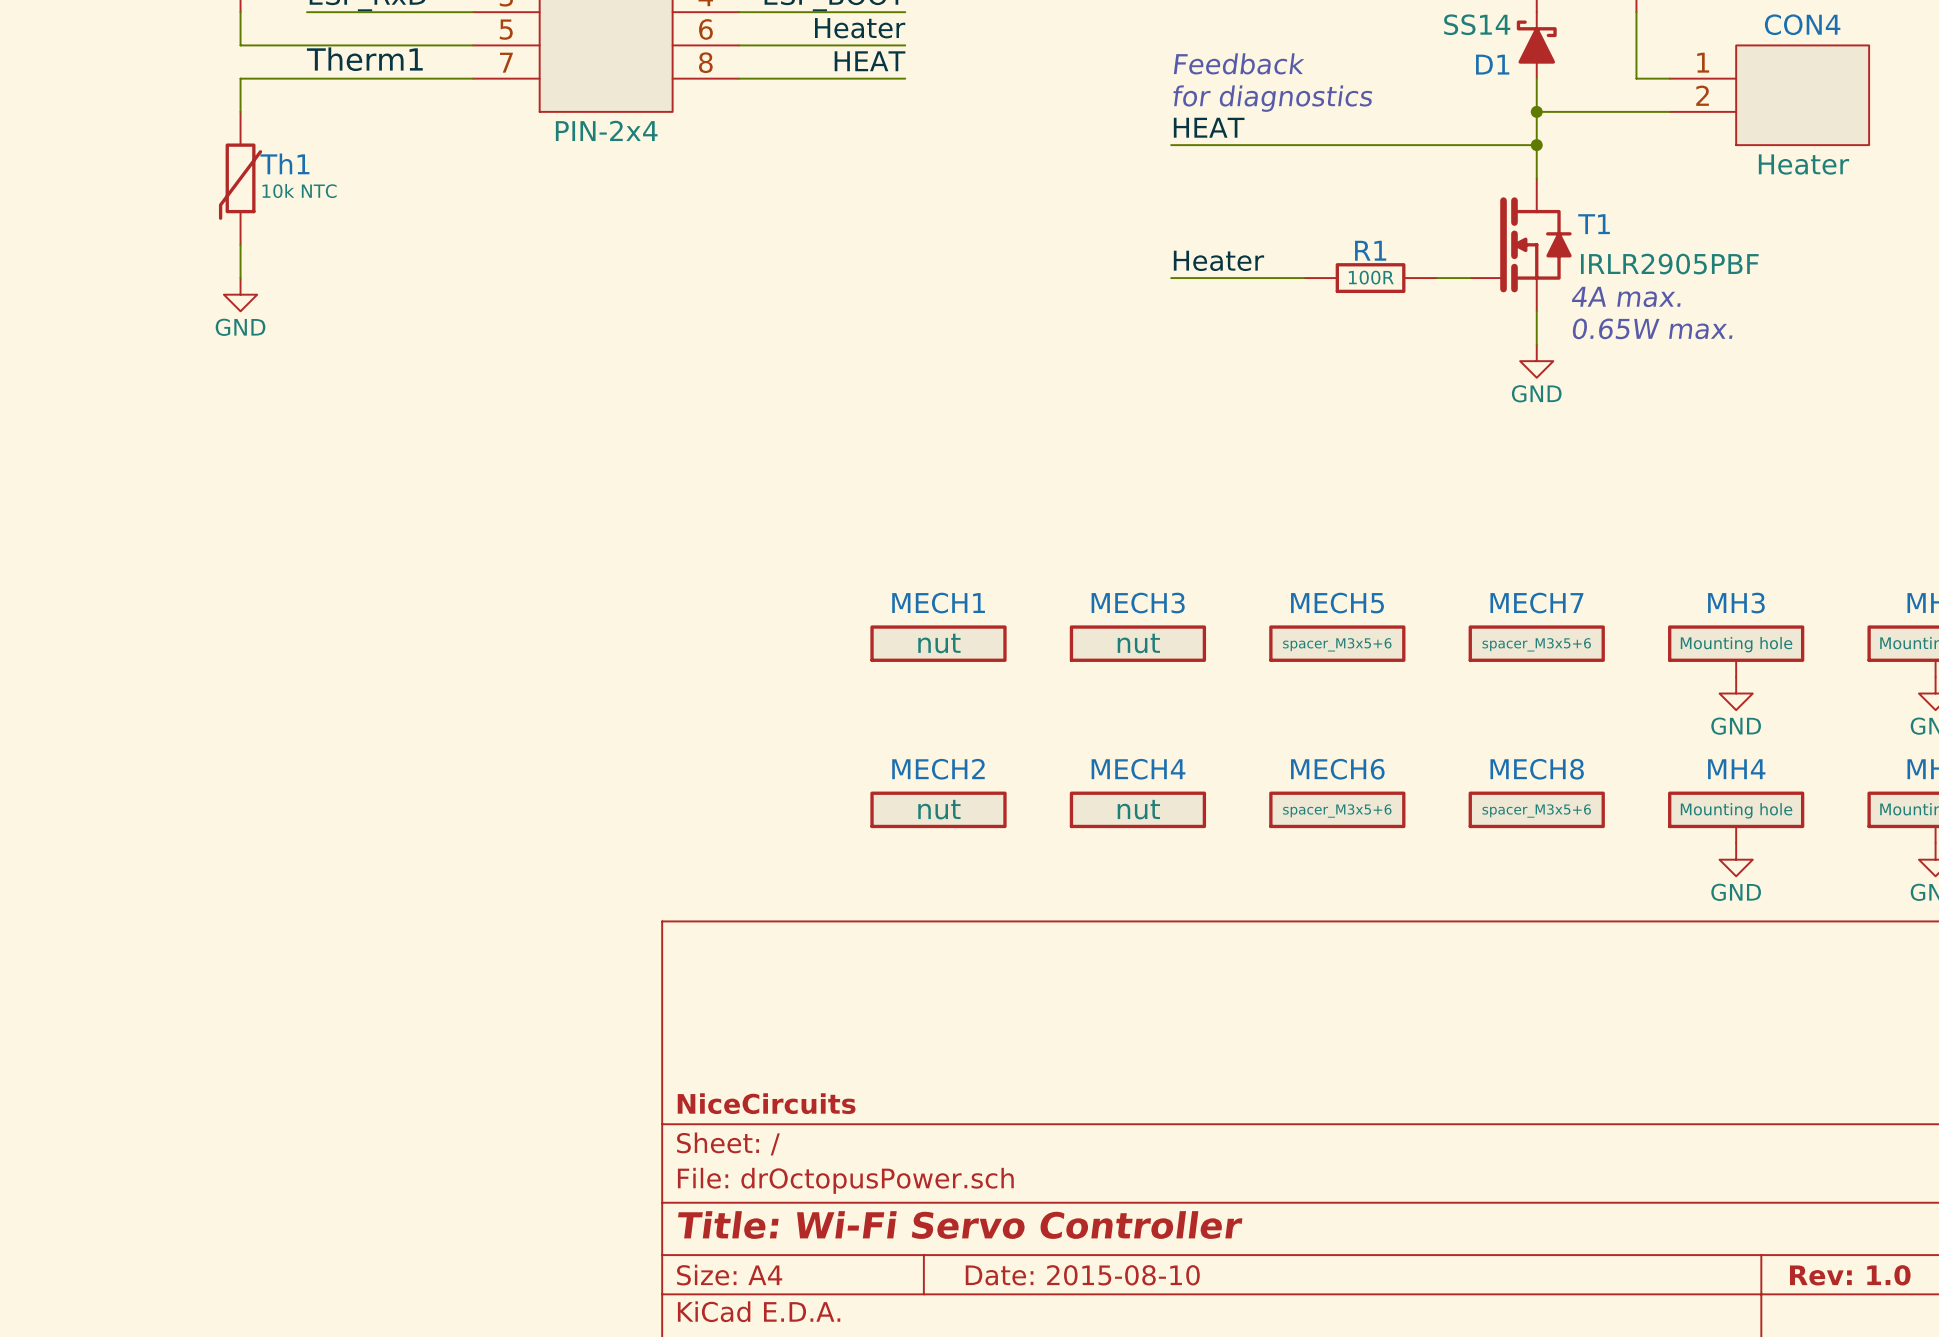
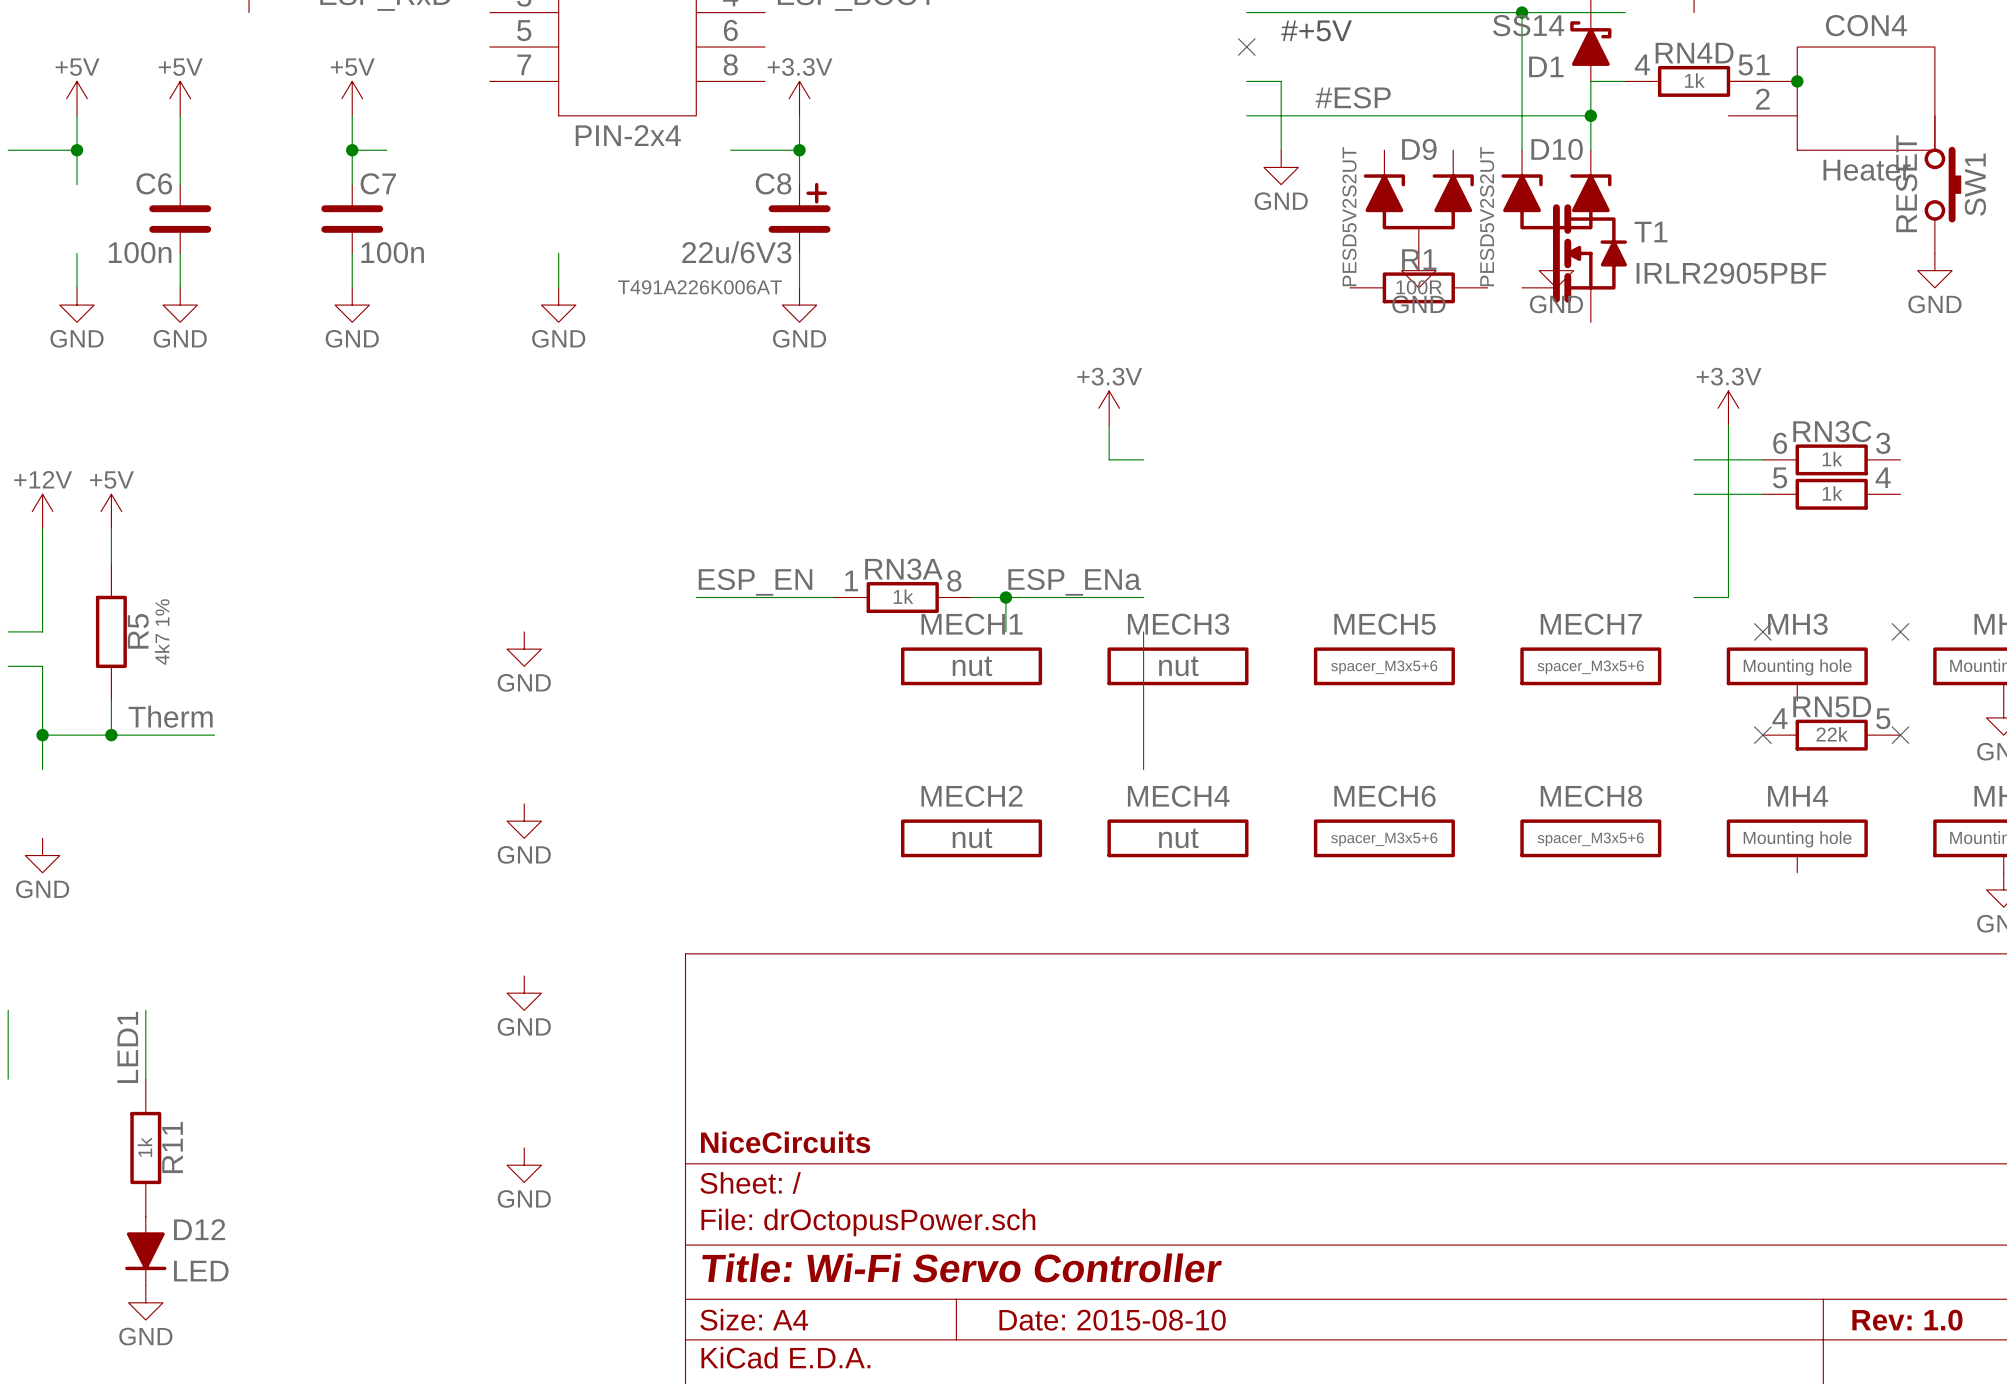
wire: (240, 12) (240, 45) (473, 45) -> none
wire: (307, 12) (473, 12) -> none
wire: (739, 12) (905, 12) -> none
wire: none -> (1246, 12) (1625, 12)
wire: none -> (1522, 12) (1522, 150)
junction: none -> (1522, 12)
wire: (1636, 12) (1636, 78) (1669, 78) -> none
label: Heater (860, 28) -> none
text: none -> #+5V (1316, 30)
wire: (739, 45) (905, 45) -> none
no-connect mark: none -> (1246, 47)
label: Therm1 (364, 59) -> none
label: HEAT (870, 61) -> none
text: Feedback (1239, 63) -> none
wire: (473, 78) (240, 78) (240, 111) -> none
wire: (739, 78) (905, 78) -> none
wire: none -> (1246, 81) (1281, 81) (1281, 150)
RN4D: none -> 1k (1694, 81)
junction: none -> (1797, 81)
label: none -> #ESP (1353, 97)
power symbol: none -> +5V (76, 98)
power symbol: none -> +5V (180, 98)
power symbol: none -> +5V (352, 98)
power symbol: none -> +3.3V (799, 98)
text: for diagnostics (1272, 98) -> none
wire: none -> (76, 115) (76, 184)
wire: none -> (180, 115) (180, 184)
wire: none -> (352, 115) (352, 184)
wire: none -> (799, 115) (799, 184)
wire: (1536, 111) (1669, 111) -> (1590, 115) (1246, 115)
label: HEAT (1209, 127) -> none
wire: none -> (8, 150) (76, 150)
junction: none -> (76, 150)
wire: none -> (352, 150) (386, 150)
junction: none -> (352, 150)
wire: none -> (730, 150) (799, 150)
junction: none -> (799, 150)
wire: (1171, 145) (1536, 145) (1536, 178) -> none
junction: (1536, 145) -> none
power symbol: none -> GND (1281, 167)
Th1: 10k NTC (240, 178) -> none
SW1: none -> RESET (1942, 184)
D9: none -> PESD5V2S2UT (1418, 201)
D10: none -> PESD5V2S2UT (1556, 201)
C8: none -> 22u/6V3 (799, 218)
C6: none -> 100n (180, 219)
C7: none -> 100n (352, 219)
wire: none -> (76, 253) (76, 287)
wire: (240, 244) (240, 278) -> (180, 253) (180, 287)
wire: none -> (352, 253) (352, 287)
wire: none -> (558, 253) (558, 287)
wire: none -> (799, 253) (799, 287)
label: Heater (1218, 260) -> none
power symbol: none -> GND (1418, 270)
power symbol: none -> GND (1556, 270)
power symbol: none -> GND (1934, 270)
wire: (1171, 278) (1304, 278) -> none
wire: (1437, 278) (1470, 278) -> (1590, 81) (1625, 81)
power symbol: none -> GND (76, 305)
power symbol: none -> GND (180, 305)
power symbol: GND (240, 294) -> none
power symbol: none -> GND (352, 305)
power symbol: none -> GND (558, 305)
power symbol: none -> GND (799, 305)
text: 4A max. (1626, 296) -> none
wire: (1536, 311) (1536, 344) -> none
text: 0.65W max. (1652, 328) -> none
power symbol: GND (1536, 361) -> none
power symbol: none -> +3.3V (1109, 408)
power symbol: none -> +3.3V (1728, 408)
wire: none -> (1109, 425) (1109, 459) (1143, 459)
wire: none -> (1728, 425) (1728, 597) (1694, 597)
wire: none -> (1694, 459) (1762, 459)
RN3C: none -> 1k (1831, 459)
wire: none -> (1694, 494) (1762, 494)
part: none -> 1k (1831, 494)
power symbol: none -> +12V (42, 511)
power symbol: none -> +5V (111, 511)
wire: none -> (42, 528) (42, 631) (8, 631)
wire: none -> (111, 528) (111, 563)
label: none -> ESP_EN (755, 582)
label: none -> ESP_ENa (1074, 582)
wire: none -> (696, 597) (833, 597)
RN3A: none -> 1k (902, 597)
wire: none -> (971, 597) (1143, 597)
wire: none -> (1005, 597) (1005, 631)
junction: none -> (1005, 597)
R5: none -> 4k7 1% (111, 631)
wire: none -> (1143, 631) (1143, 769)
no-connect mark: none -> (1762, 631)
no-connect mark: none -> (1900, 631)
power symbol: none -> GND (524, 649)
wire: none -> (8, 666) (42, 666) (42, 769)
wire: none -> (111, 700) (111, 735)
label: none -> Therm (170, 716)
power symbol: GND (1736, 693) -> none
wire: none -> (42, 735) (214, 735)
junction: none -> (42, 735)
junction: none -> (111, 735)
no-connect mark: none -> (1762, 735)
RN5D: none -> 22k (1831, 735)
no-connect mark: none -> (1900, 735)
power symbol: none -> GND (524, 821)
power symbol: none -> GND (42, 855)
power symbol: GND (1736, 859) -> none
power symbol: none -> GND (524, 993)
wire: none -> (8, 1010) (8, 1079)
wire: none -> (145, 1010) (145, 1079)
label: none -> LED1 (127, 1047)
R11: none -> 1k (145, 1148)
power symbol: none -> GND (524, 1165)
D12: none -> LED (145, 1251)
power symbol: none -> GND (145, 1302)

